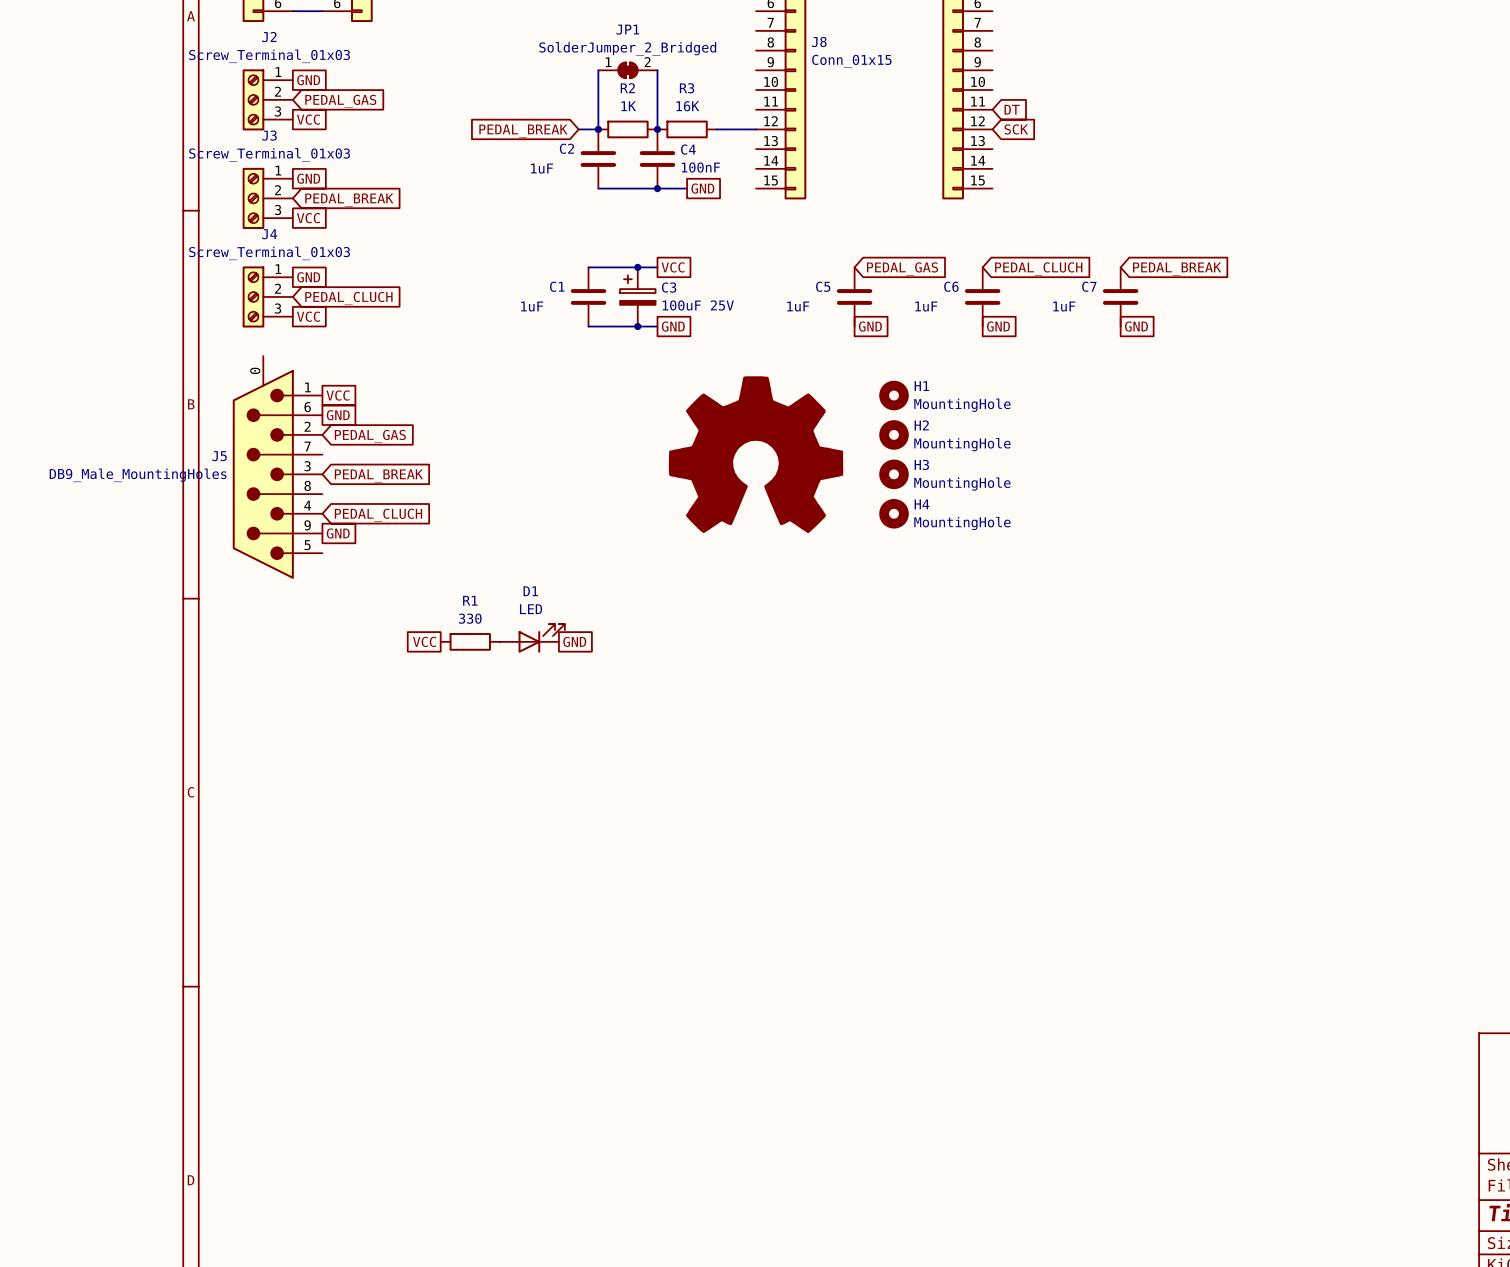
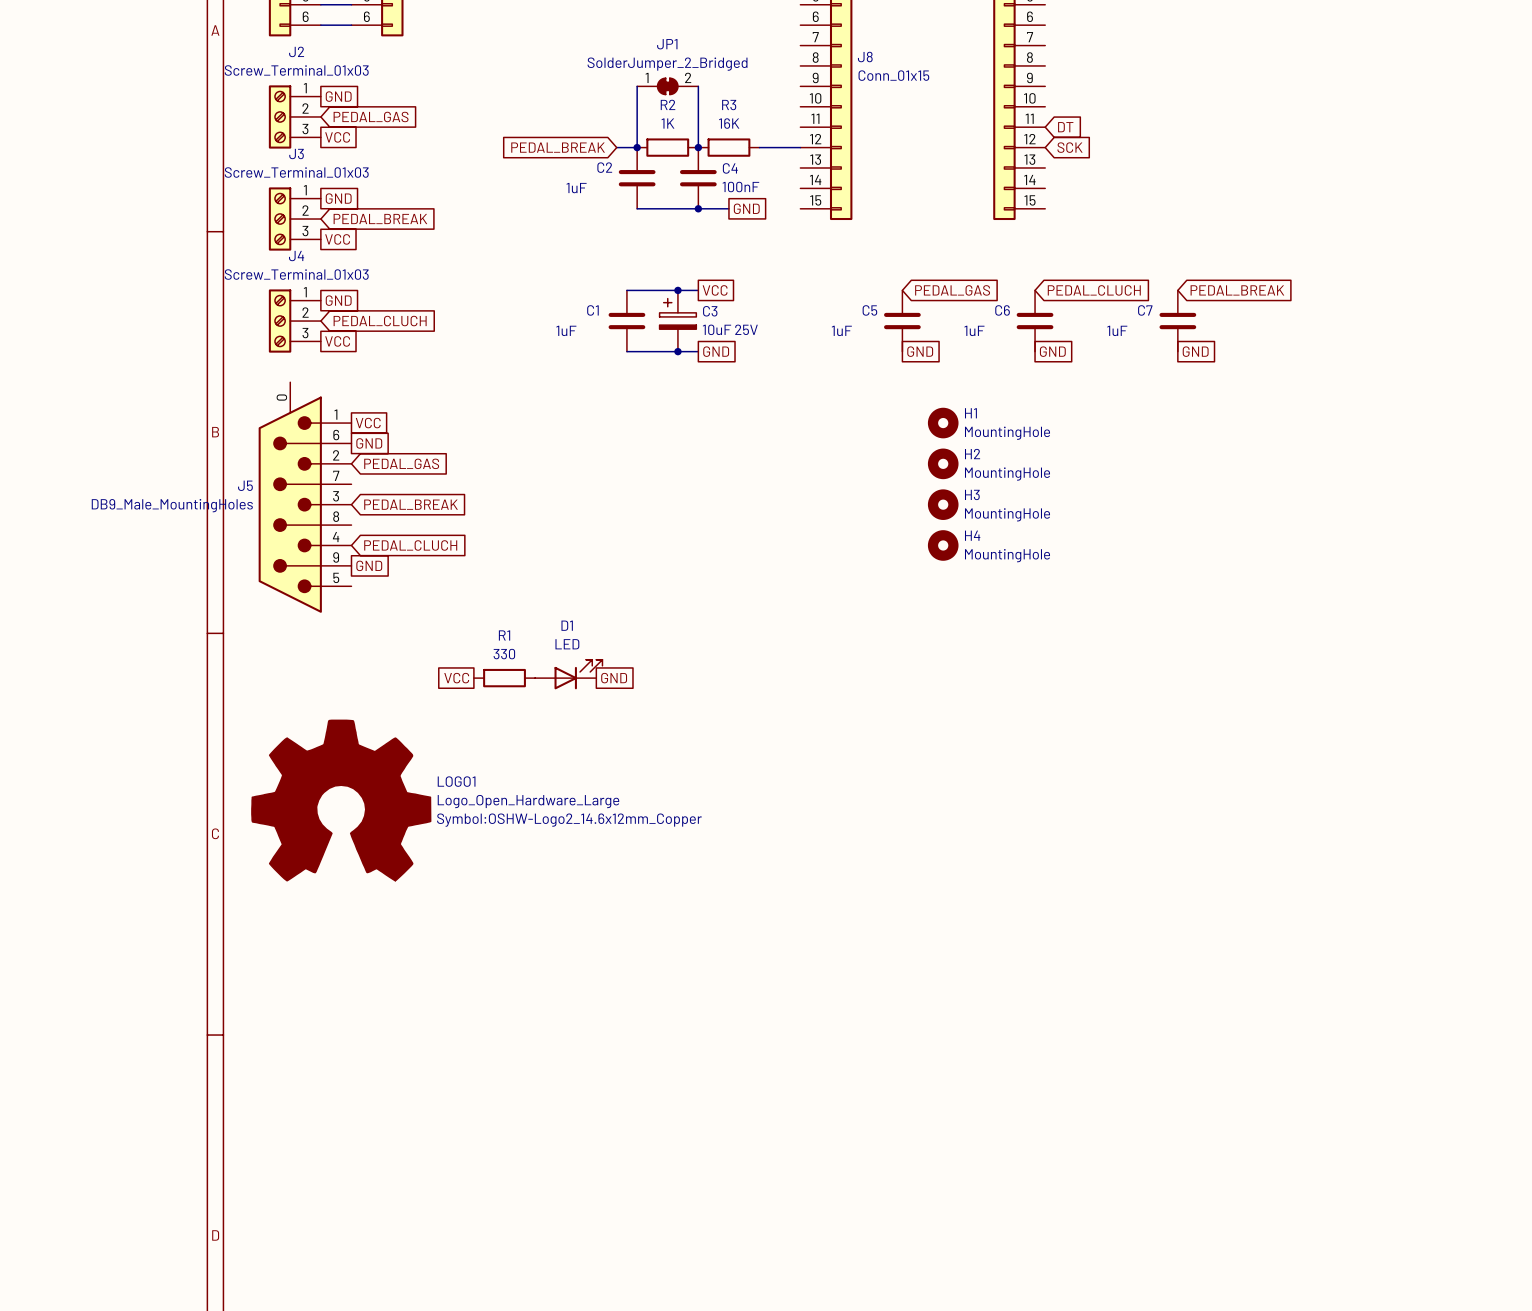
C3 value: 100uF 25V (698, 305) -> 10uF 25V (730, 329)
power symbol: (756, 454) -> none
LOGO1: none -> Logo_Open_Hardware_Large (341, 800)

